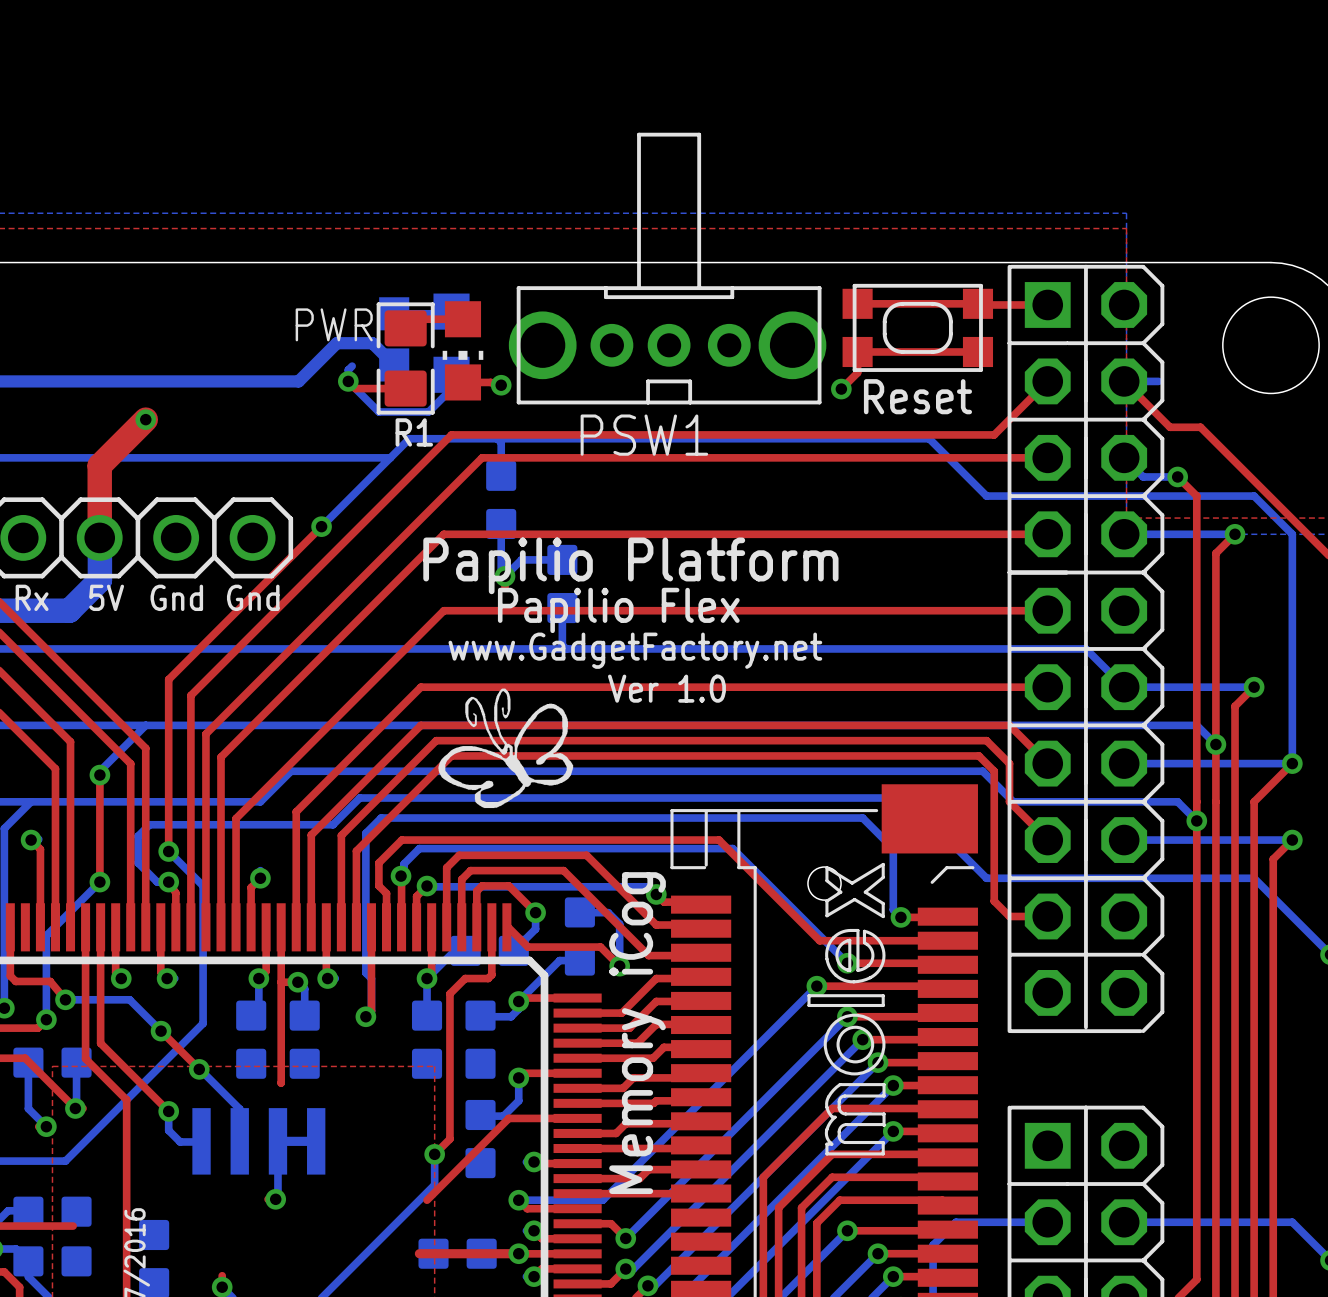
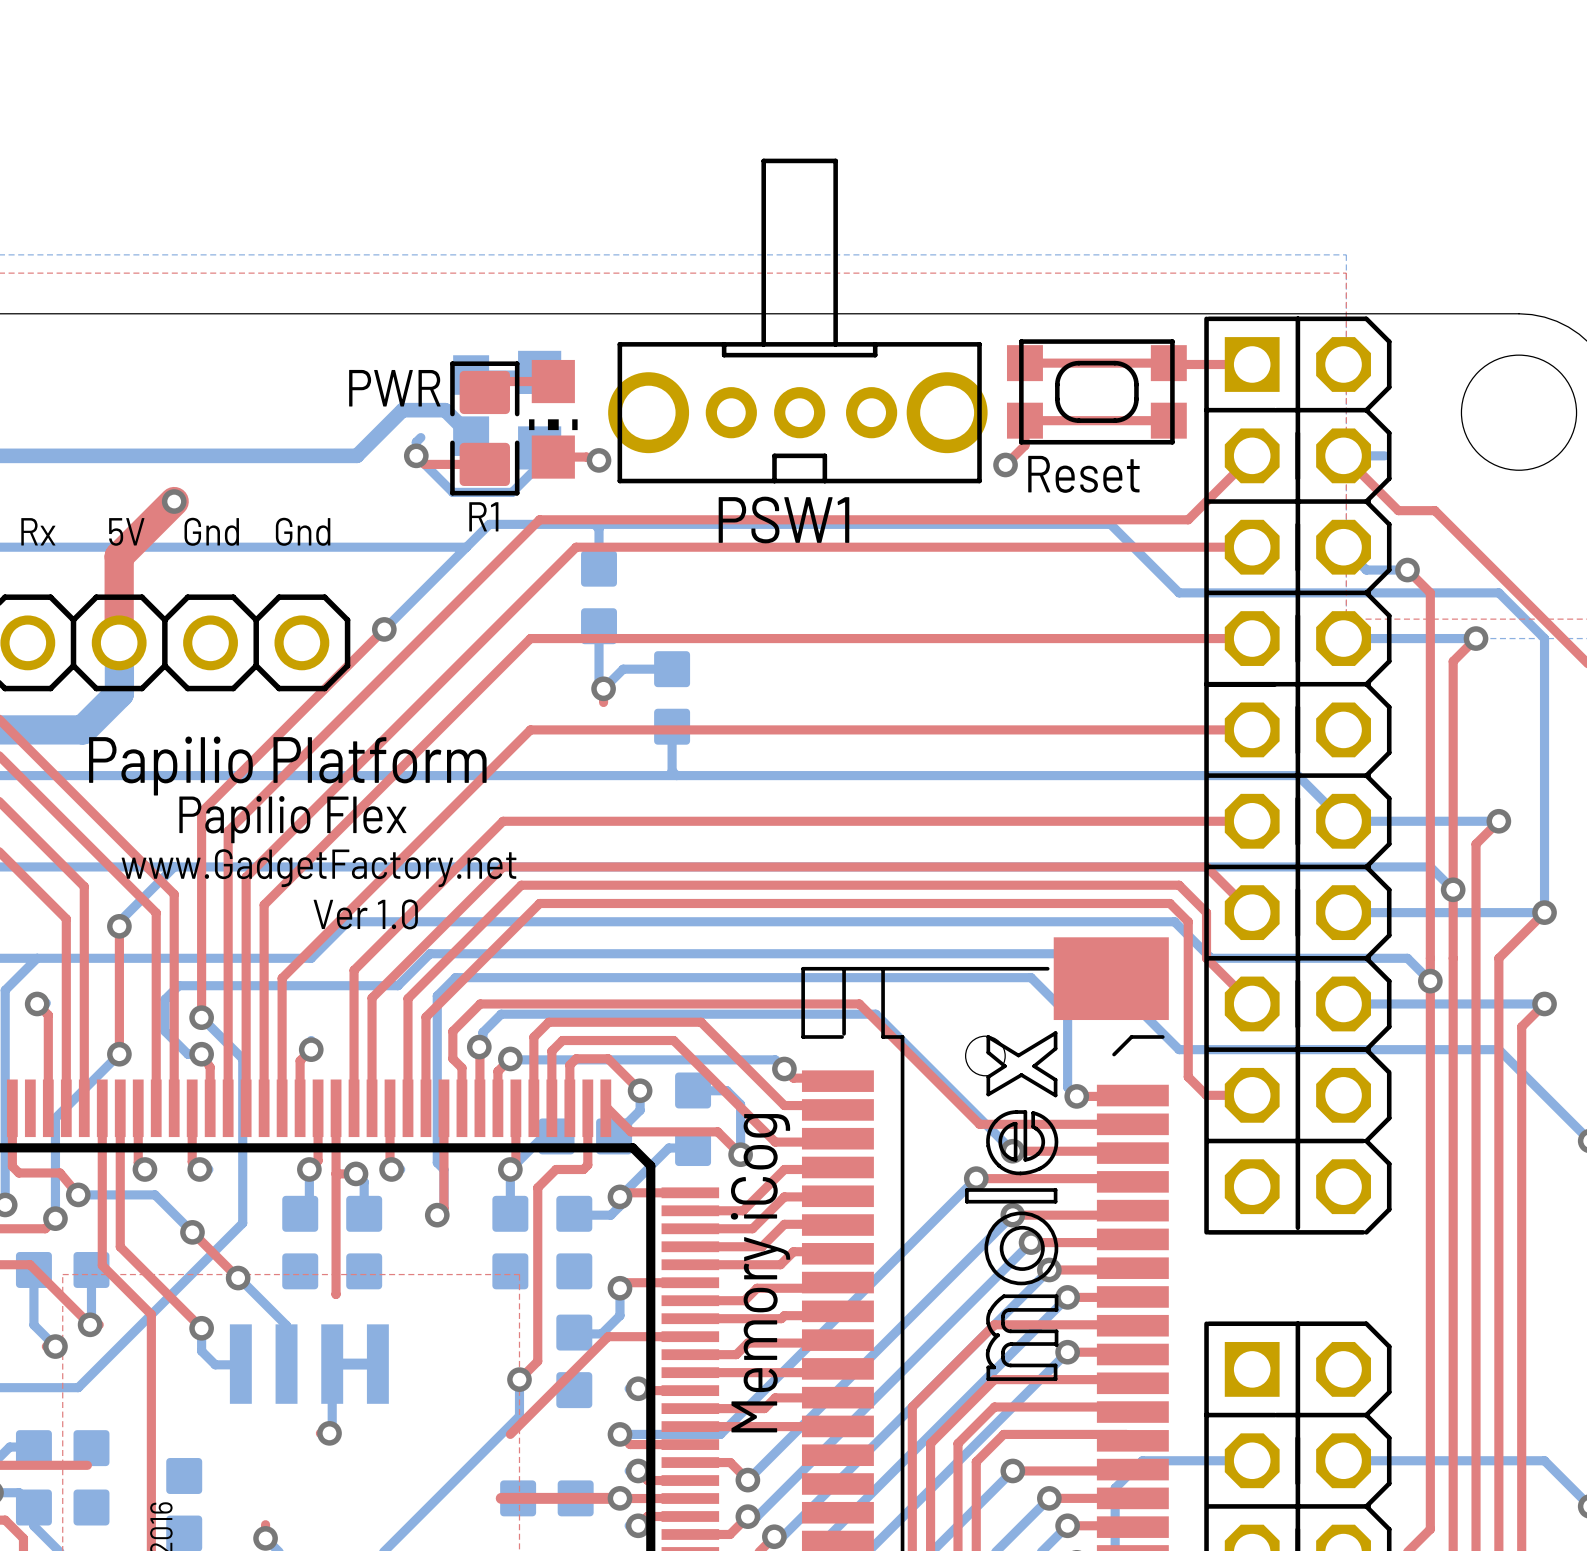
text: none -> Gnd (211, 531)
text: none -> Gnd (303, 531)
text position: Papilio Platform (630, 565) -> Papilio Platform (287, 766)
text position: Rx (32, 597) -> Rx (38, 531)
text position: 5V (106, 597) -> 5V (126, 531)
text: Gnd (176, 597) -> none
text: Gnd (253, 597) -> none
text position: Papilio Flex (618, 610) -> Papilio Flex (292, 819)
text position: www.GadgetFactory.net (635, 650) -> www.GadgetFactory.net (319, 868)
drawing: [438, 688, 574, 809] -> none
text position: Ver 1.0 (666, 688) -> Ver 1.0 (365, 914)

